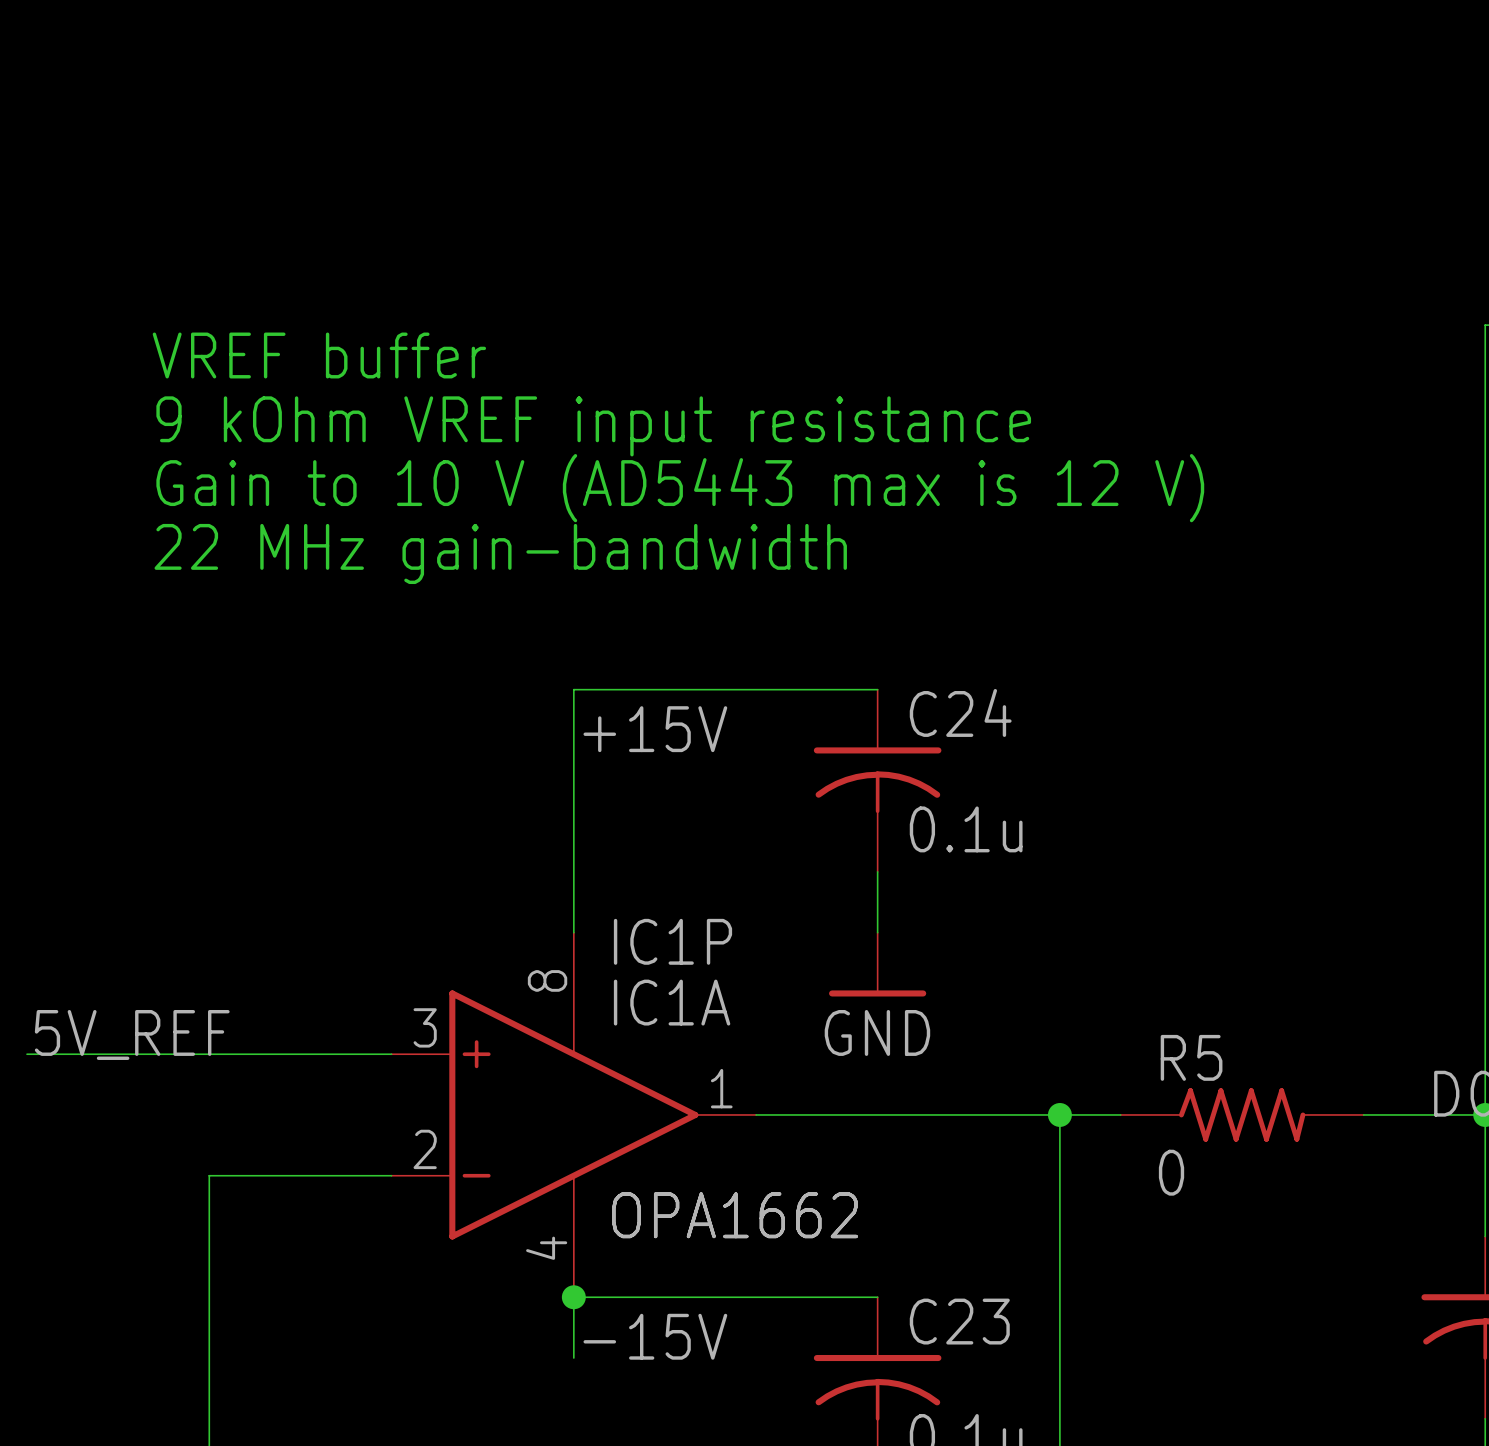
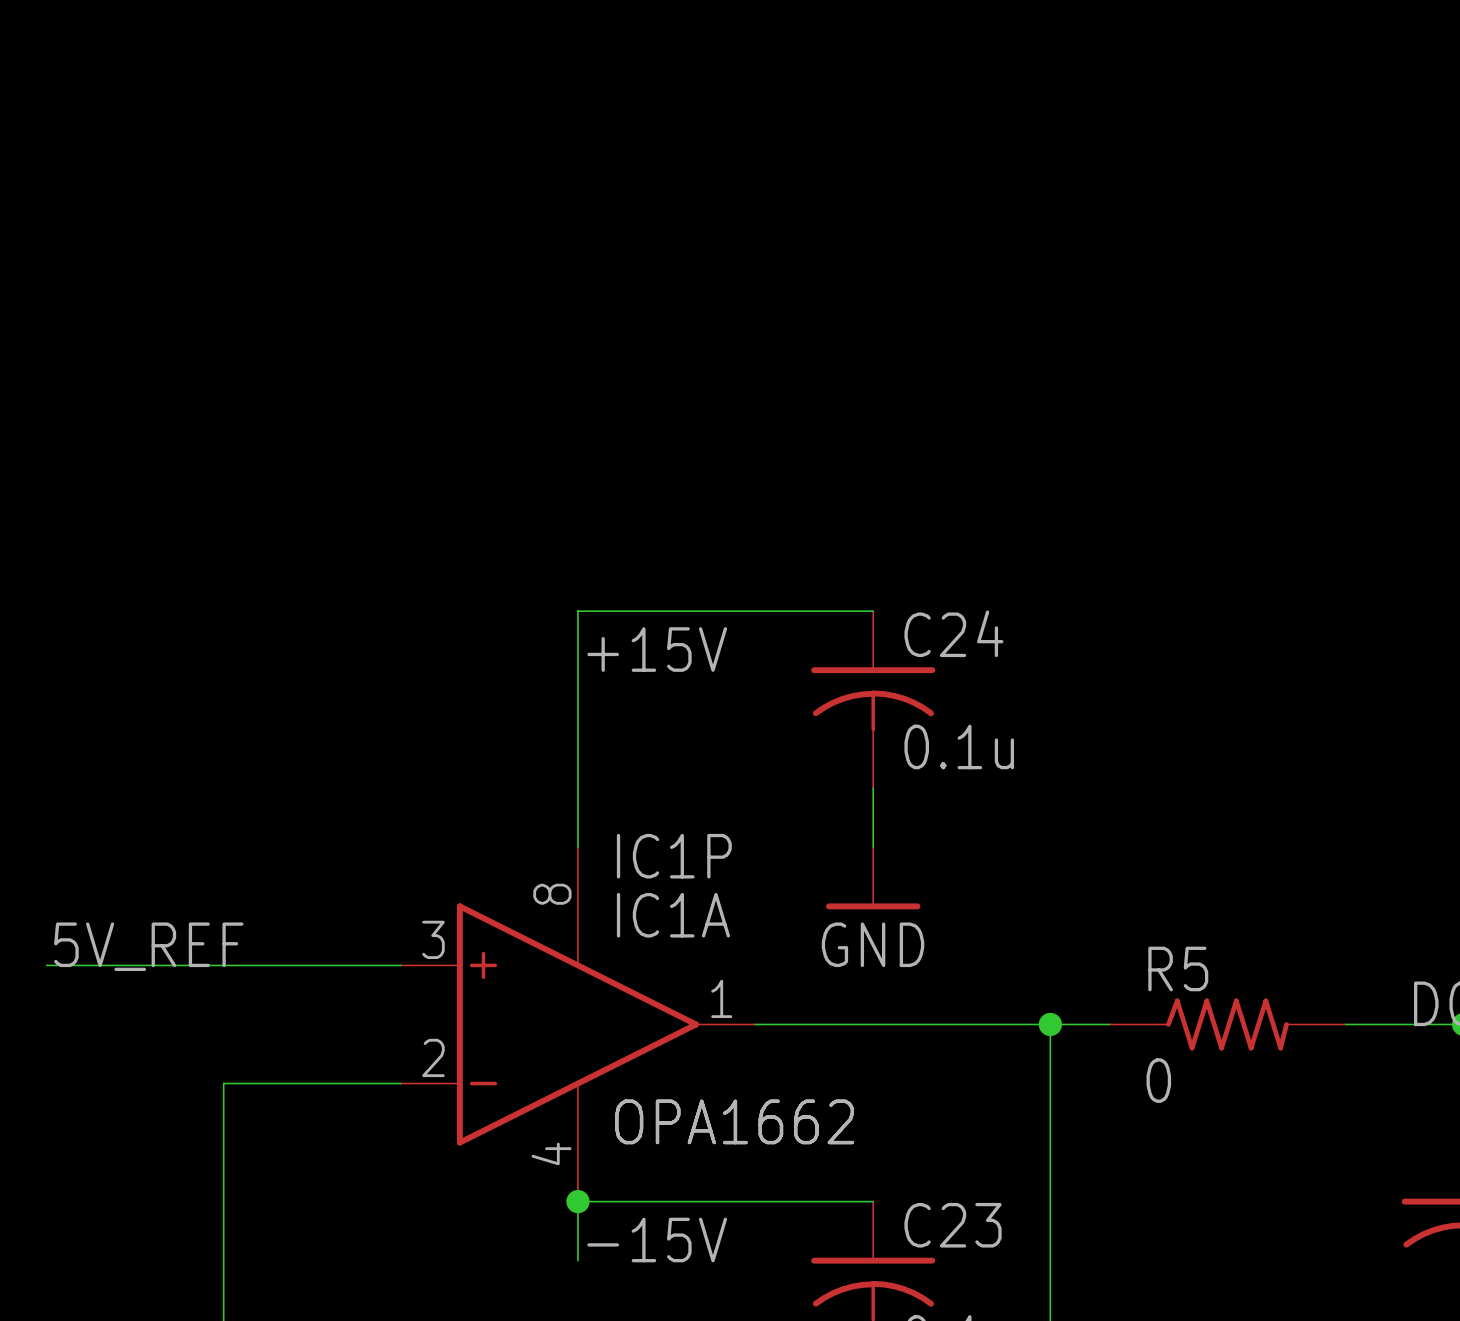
text: VREF buffer (319, 355) -> none
text: 9 kOhm VREF input resistance (593, 426) -> none
text: Gain to 10 V (AD5443 max is 12 V) (680, 488) -> none
text: 22 MHz gain-bandwidth (500, 553) -> none

